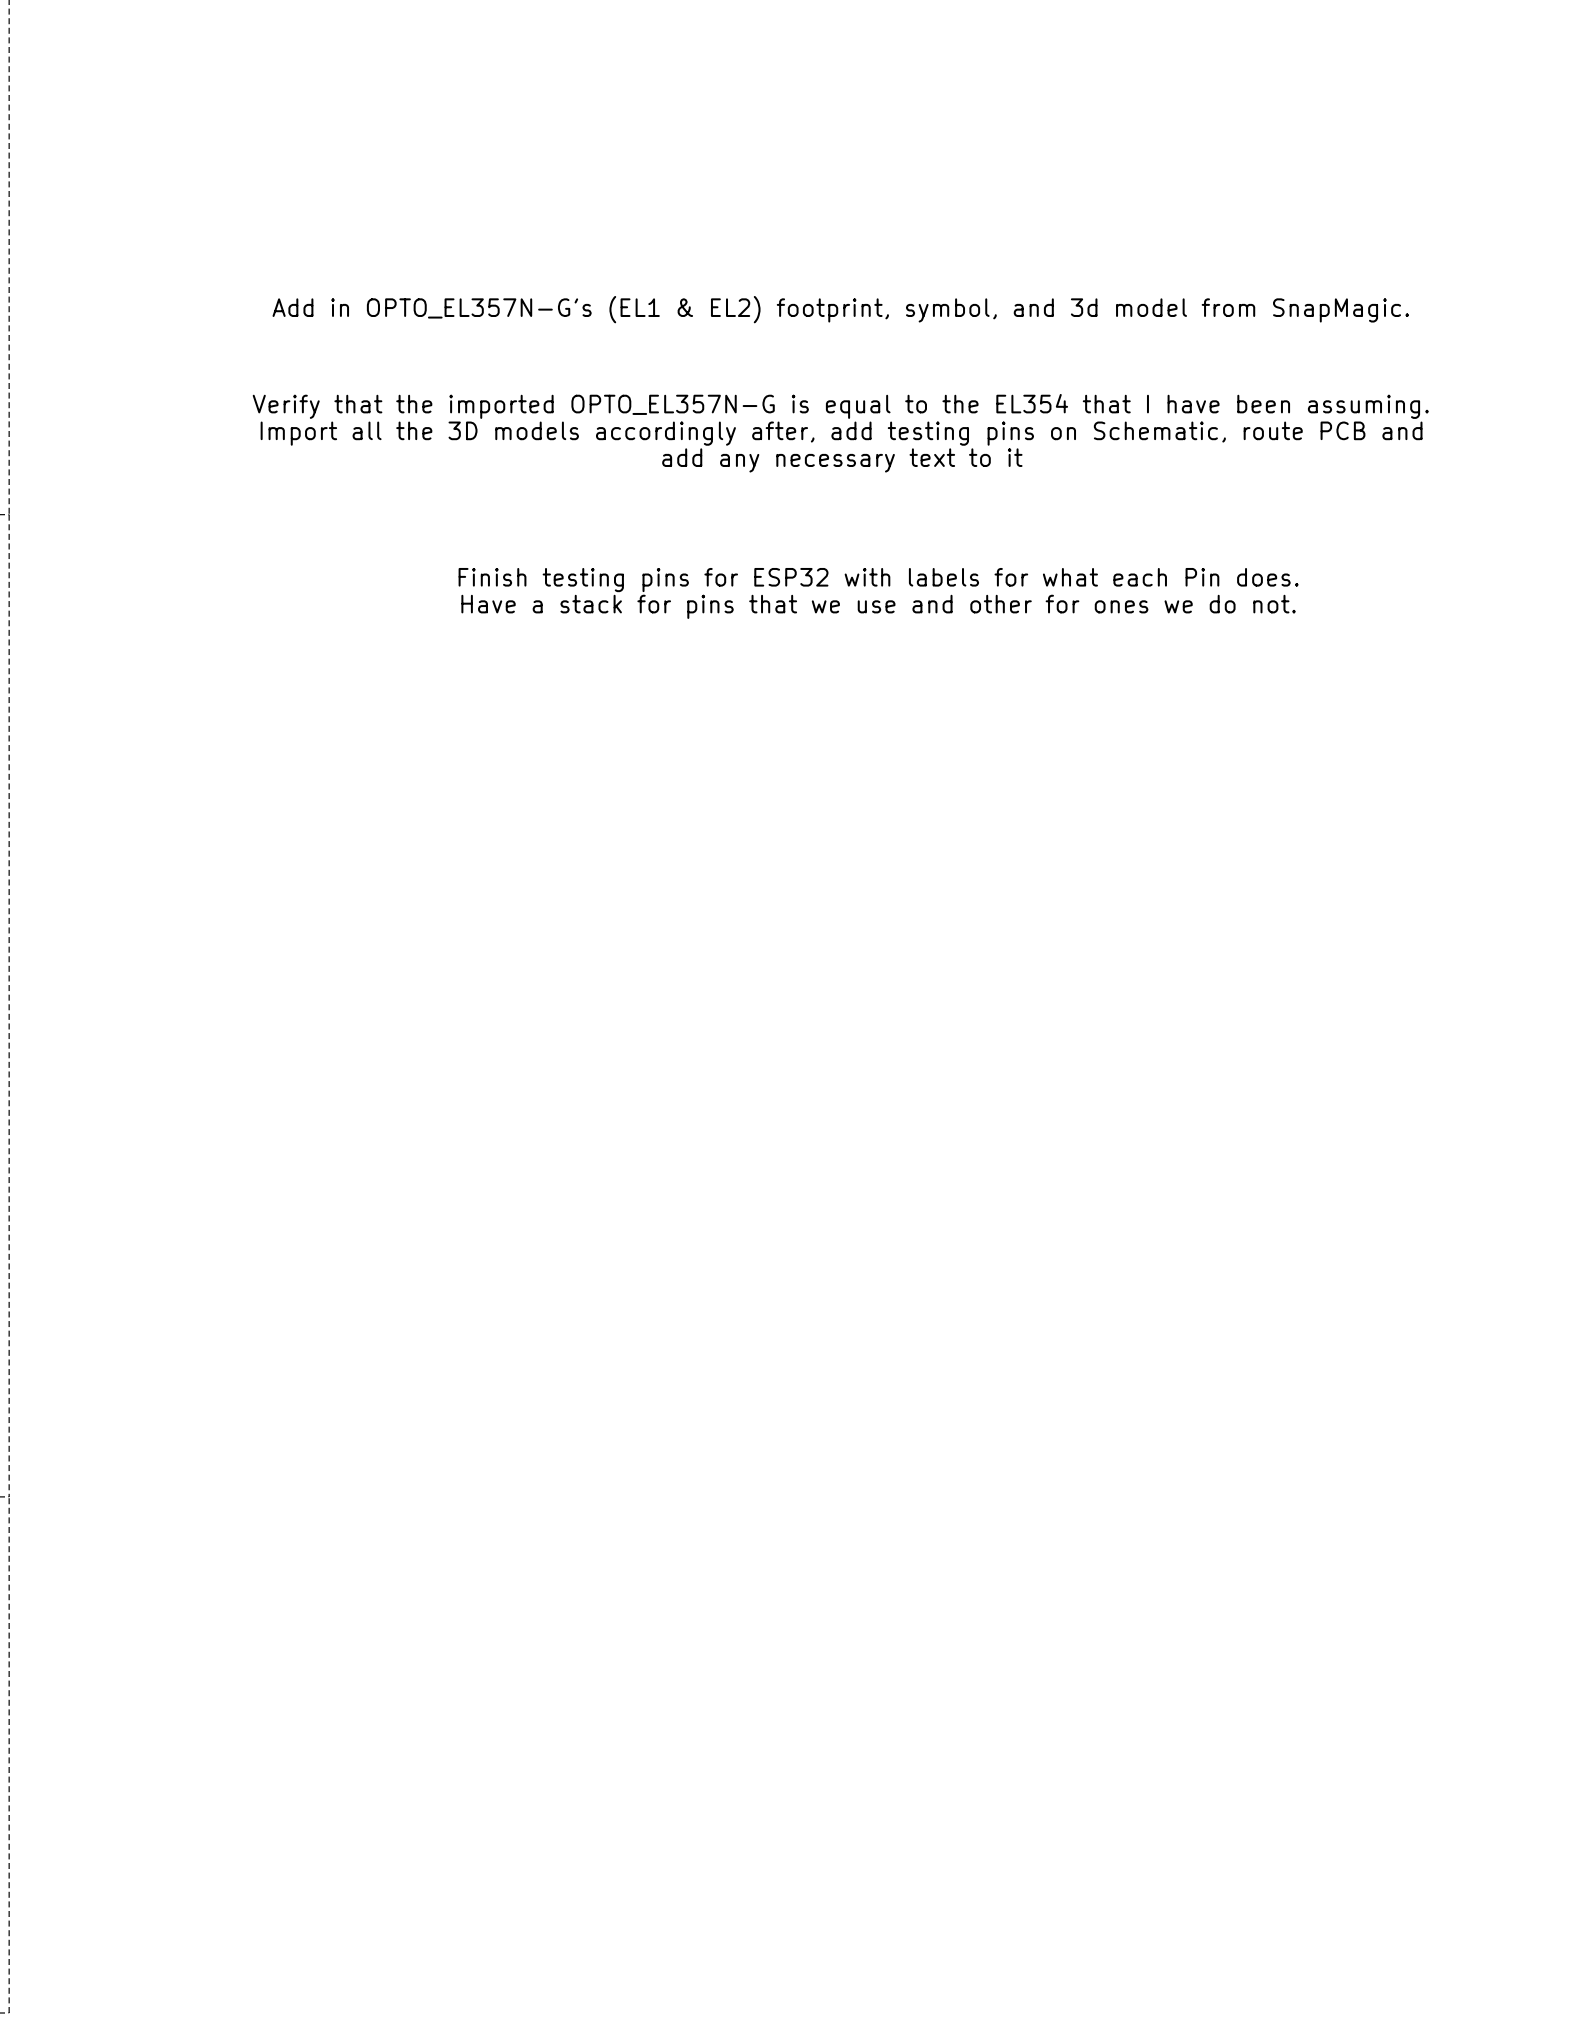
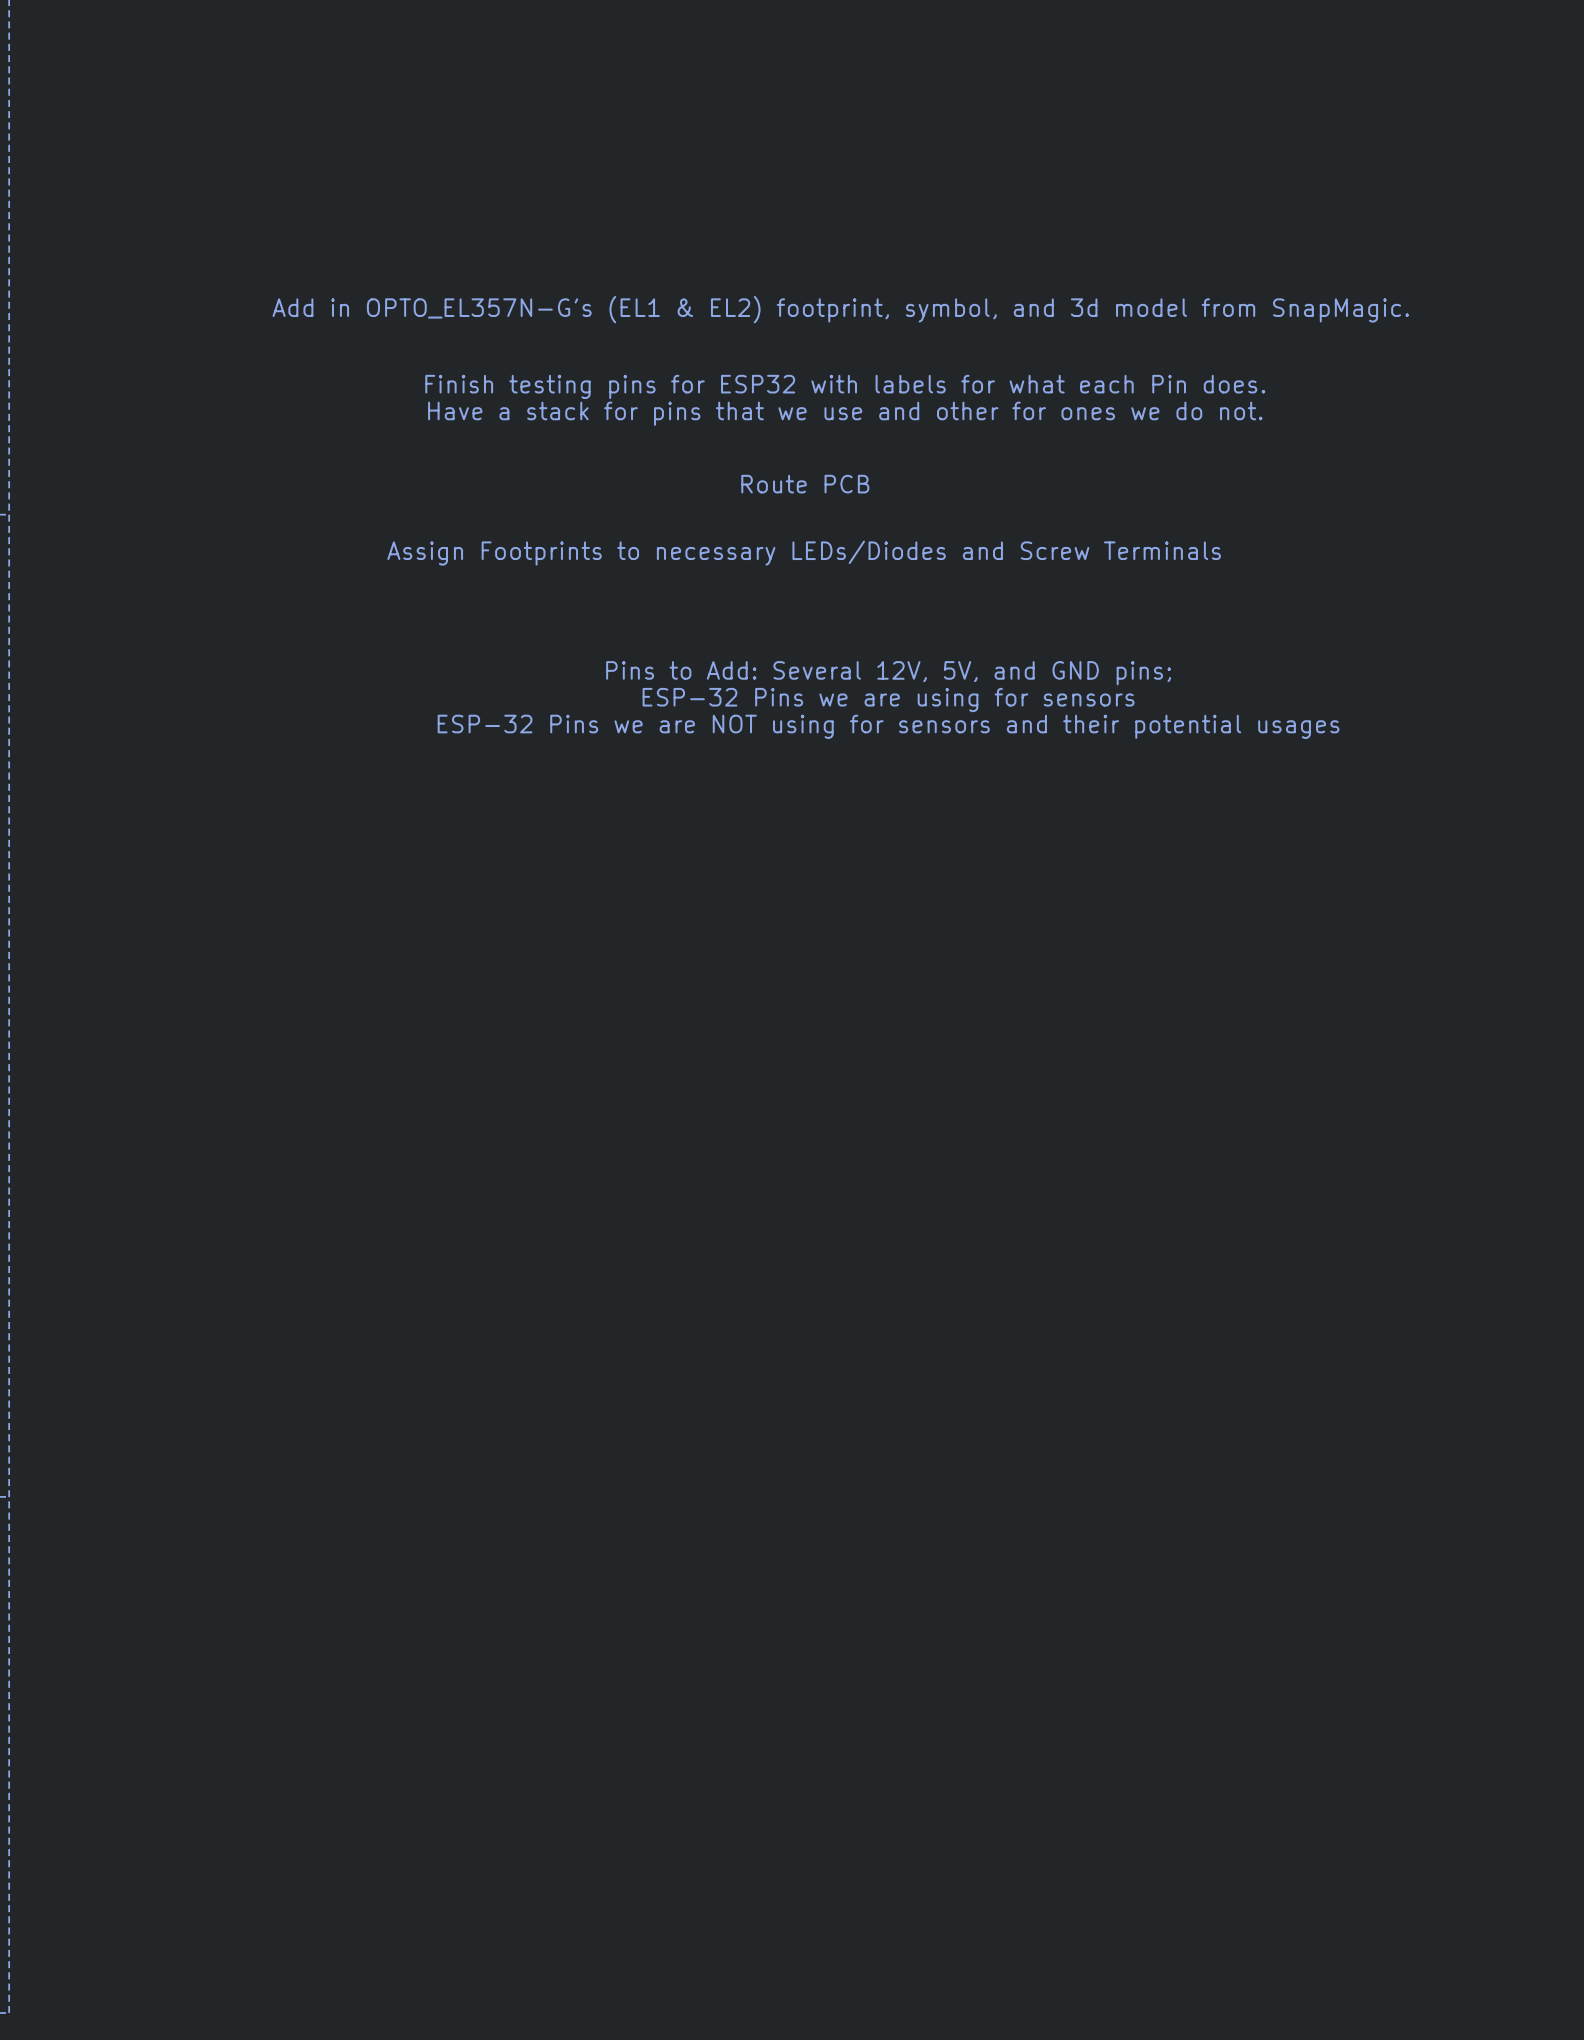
text: Verify that the imported OPTO_EL357N-G is equal to the EL354 that I have been assuming. (840, 406) -> none
text: Import all the 3D models accordingly after, add testing pins on Schematic, route PCB and (841, 433) -> none
text: add any necessary text to it (842, 460) -> none
text: none -> Route PCB (805, 484)
text: none -> Assign Footprints to necessary LEDs/Diodes and Screw Terminals (804, 553)
text position: Finish testing pins for ESP32 with labels for what each Pin does. (878, 580) -> Finish testing pins for ESP32 with labels for what each Pin does. (845, 386)
text position: Have a stack for pins that we use and other for ones we do not. (878, 606) -> Have a stack for pins that we use and other for ones we do not. (845, 413)
text: none -> Pins to Add: Several 12V, 5V, and GND pins; (888, 673)
text: none -> ESP-32 Pins we are using for sensors (888, 700)
text: none -> ESP-32 Pins we are NOT using for sensors and their potential usages (888, 726)

